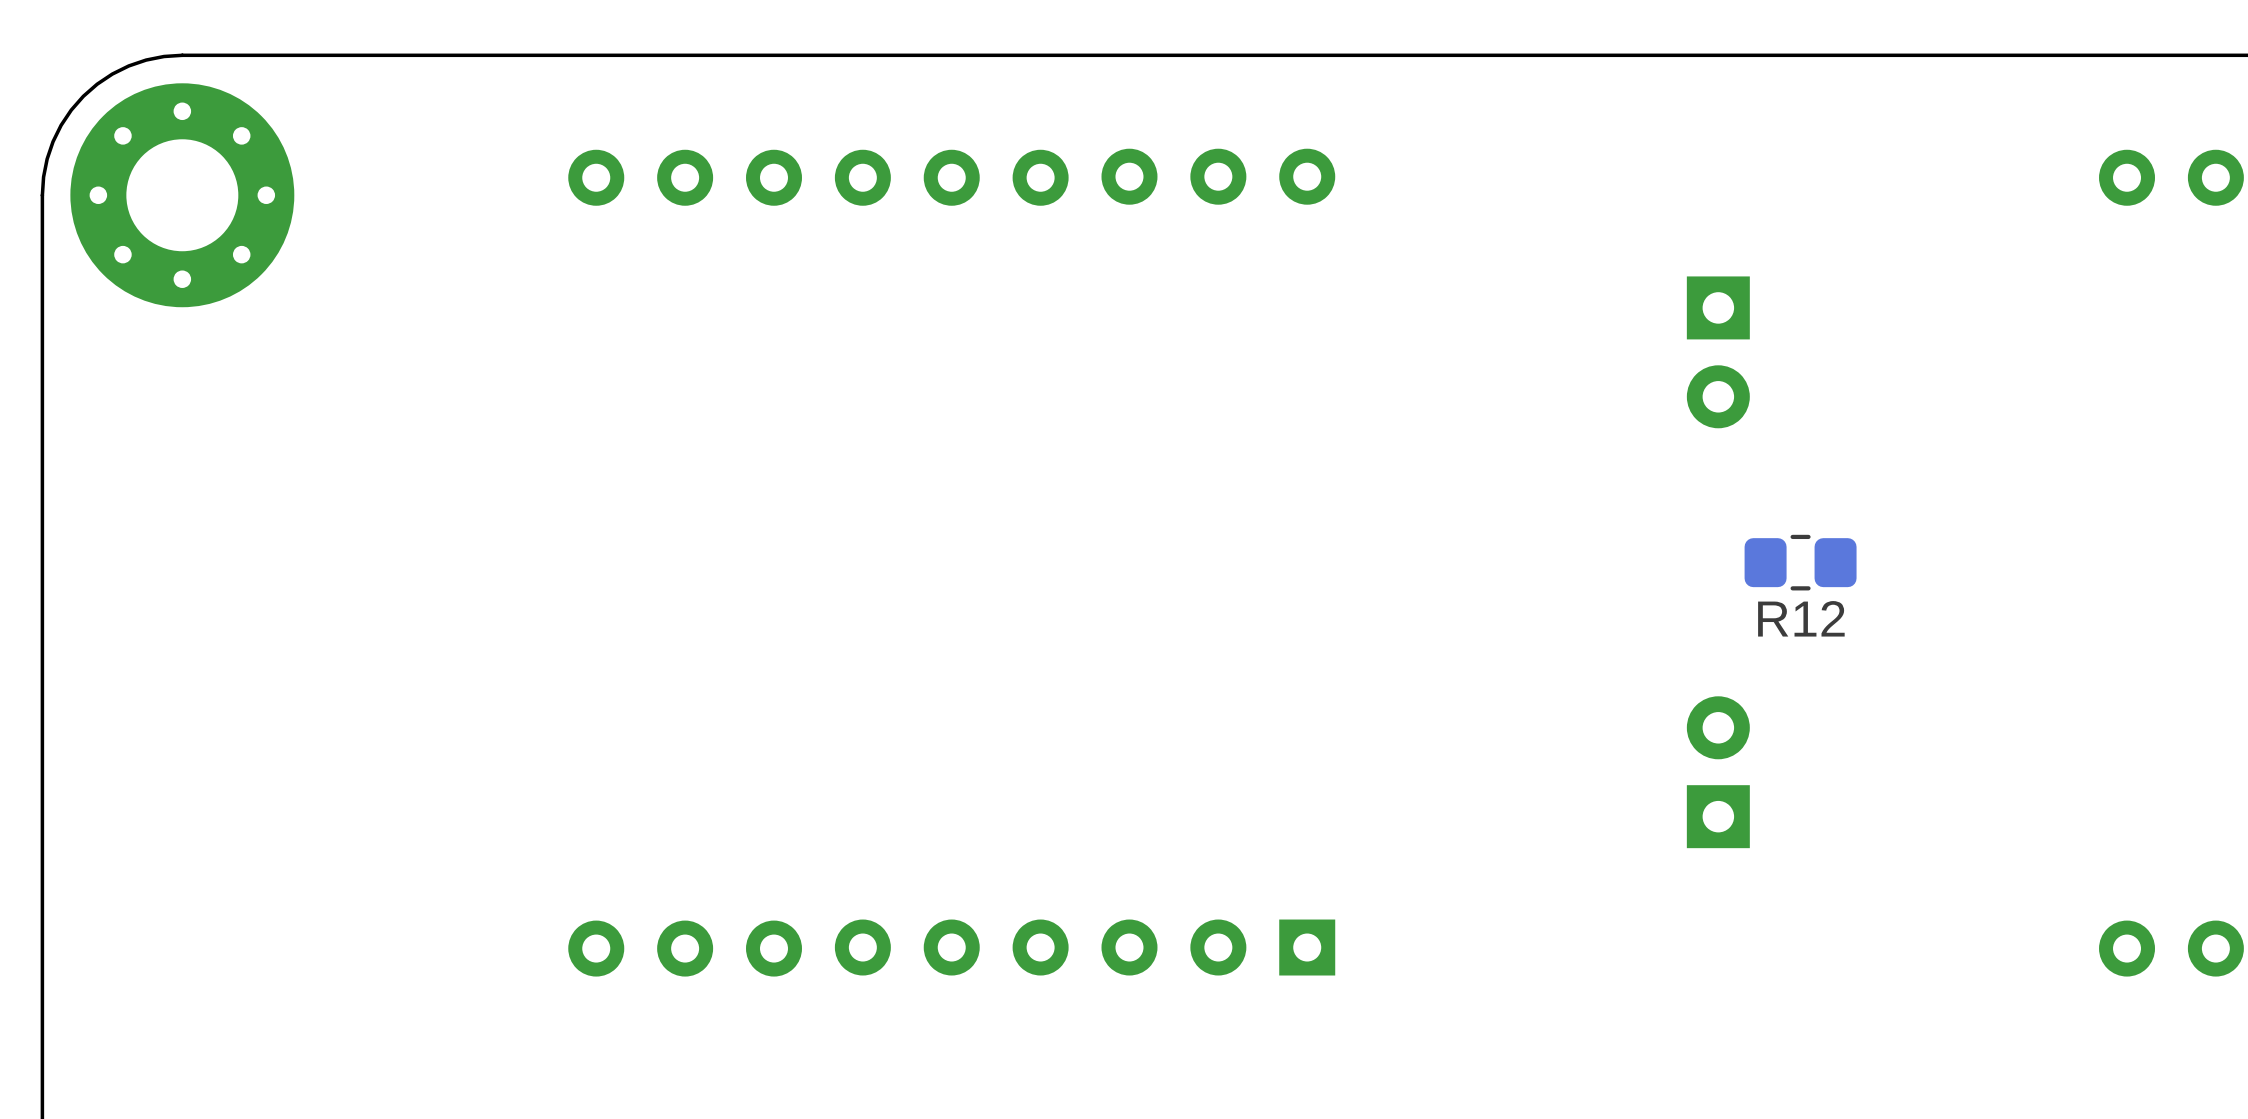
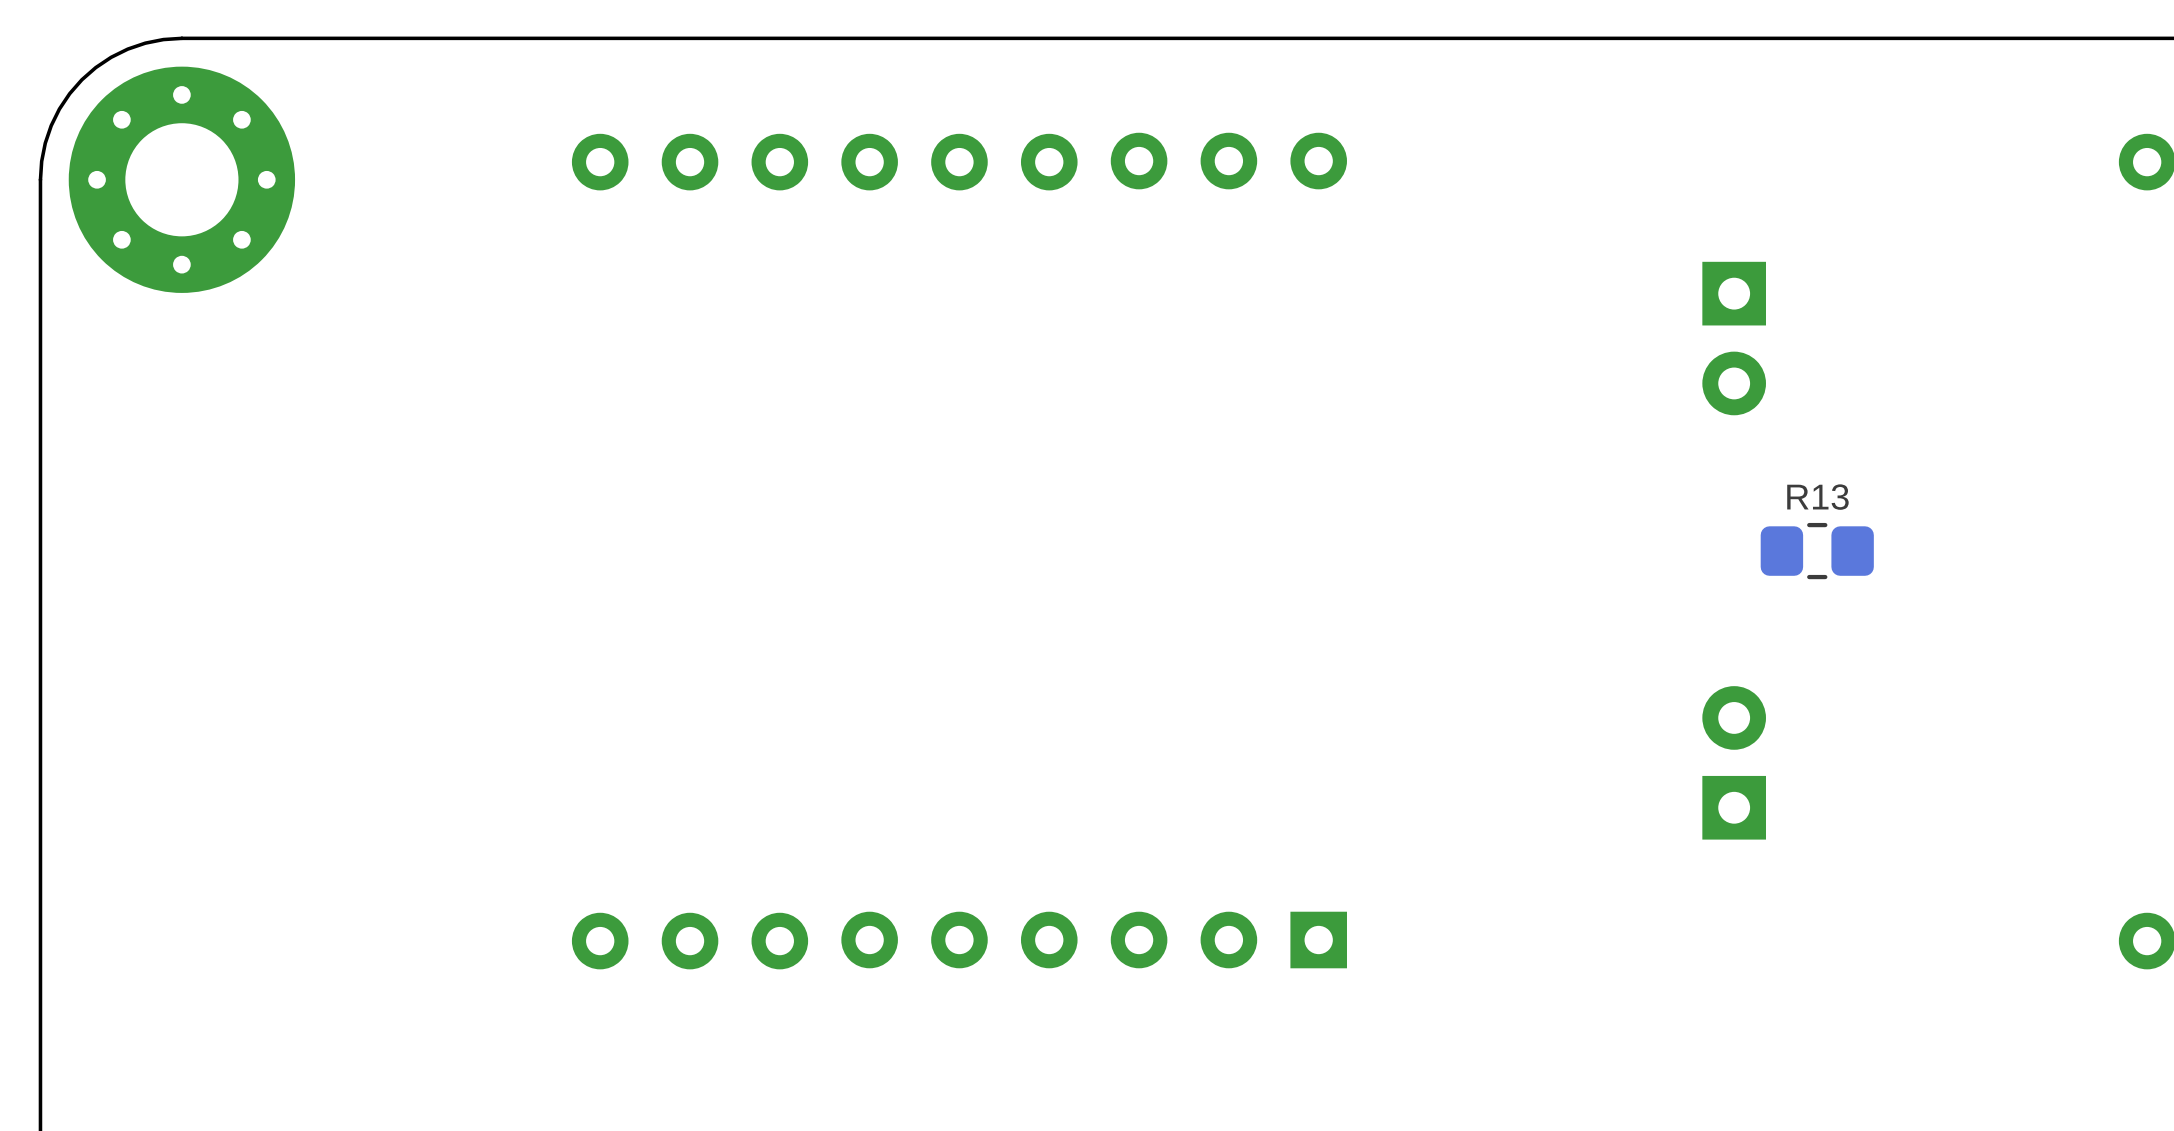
R12 name: R12 (1801, 618) -> R13 (1817, 497)

